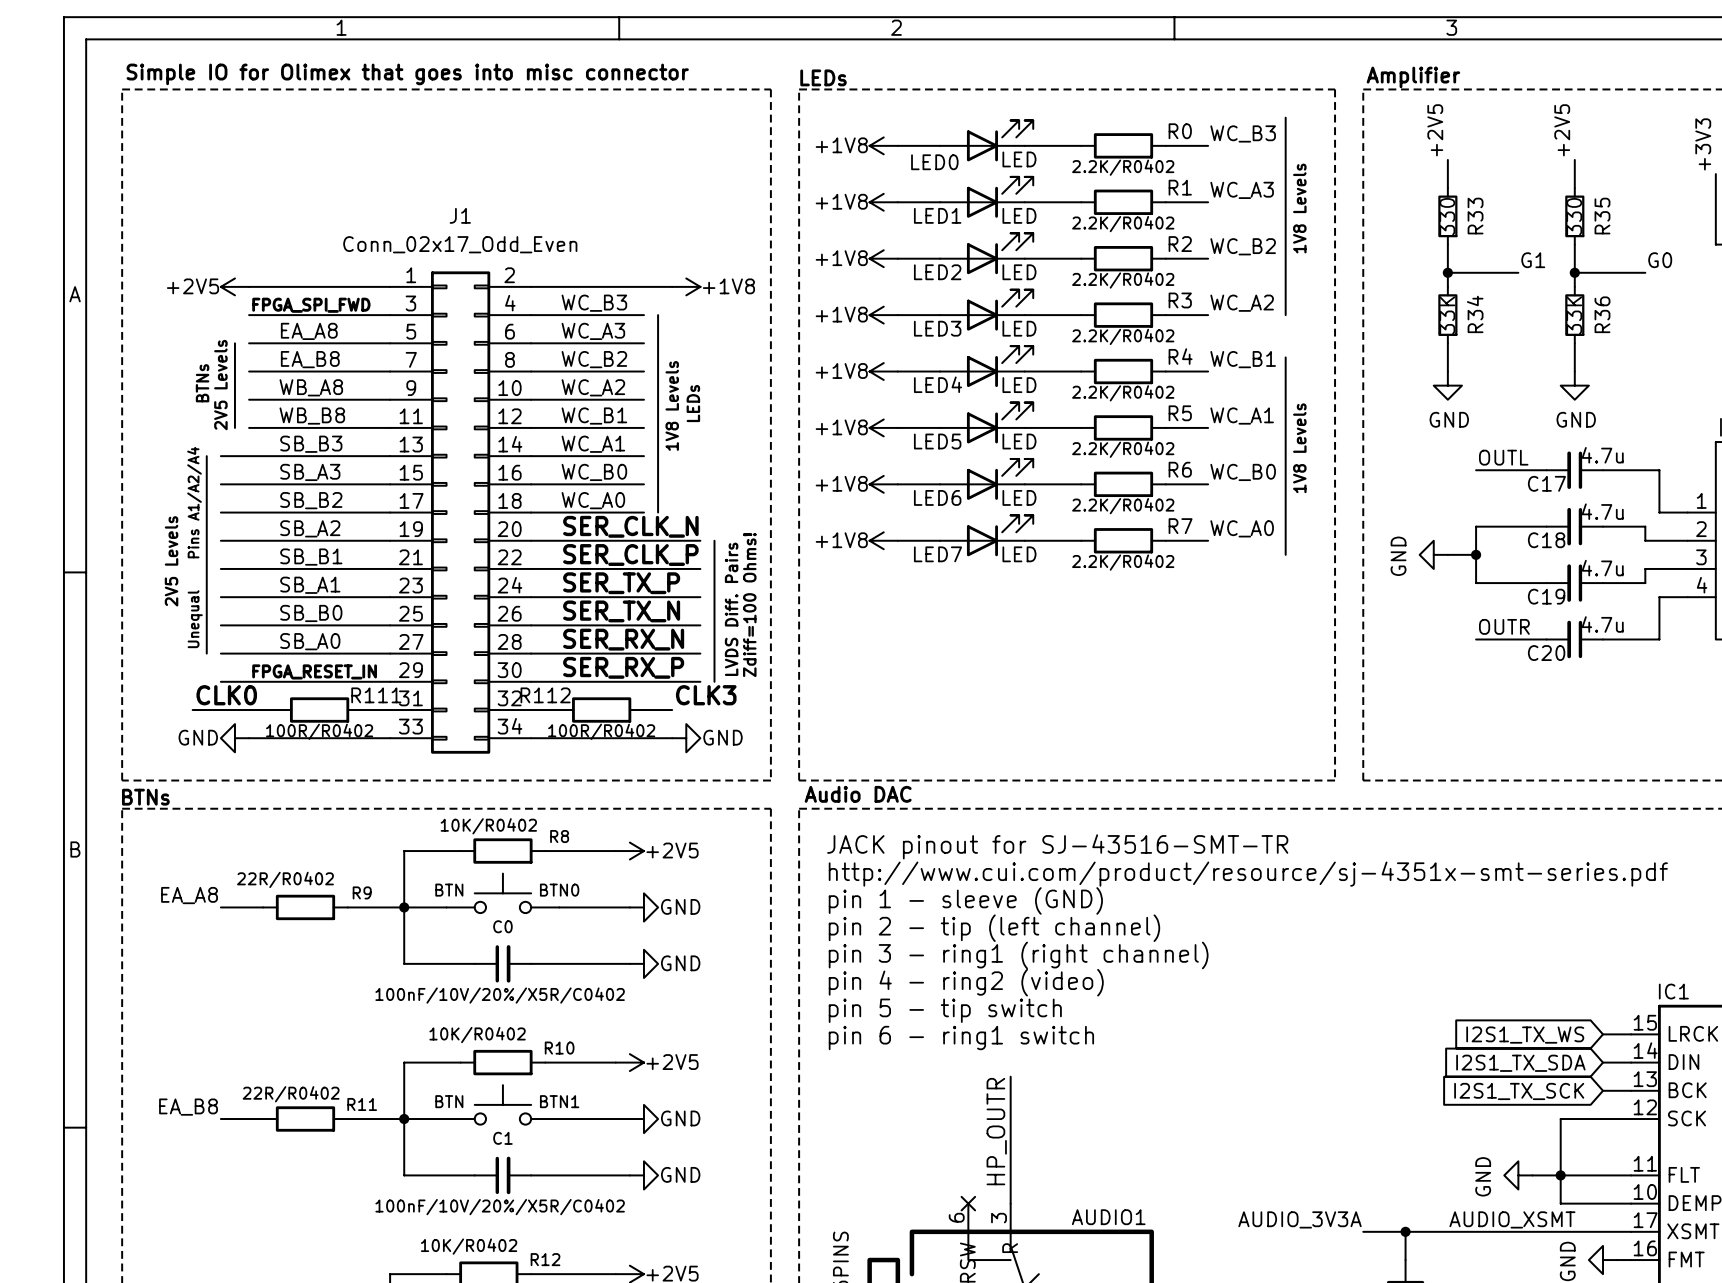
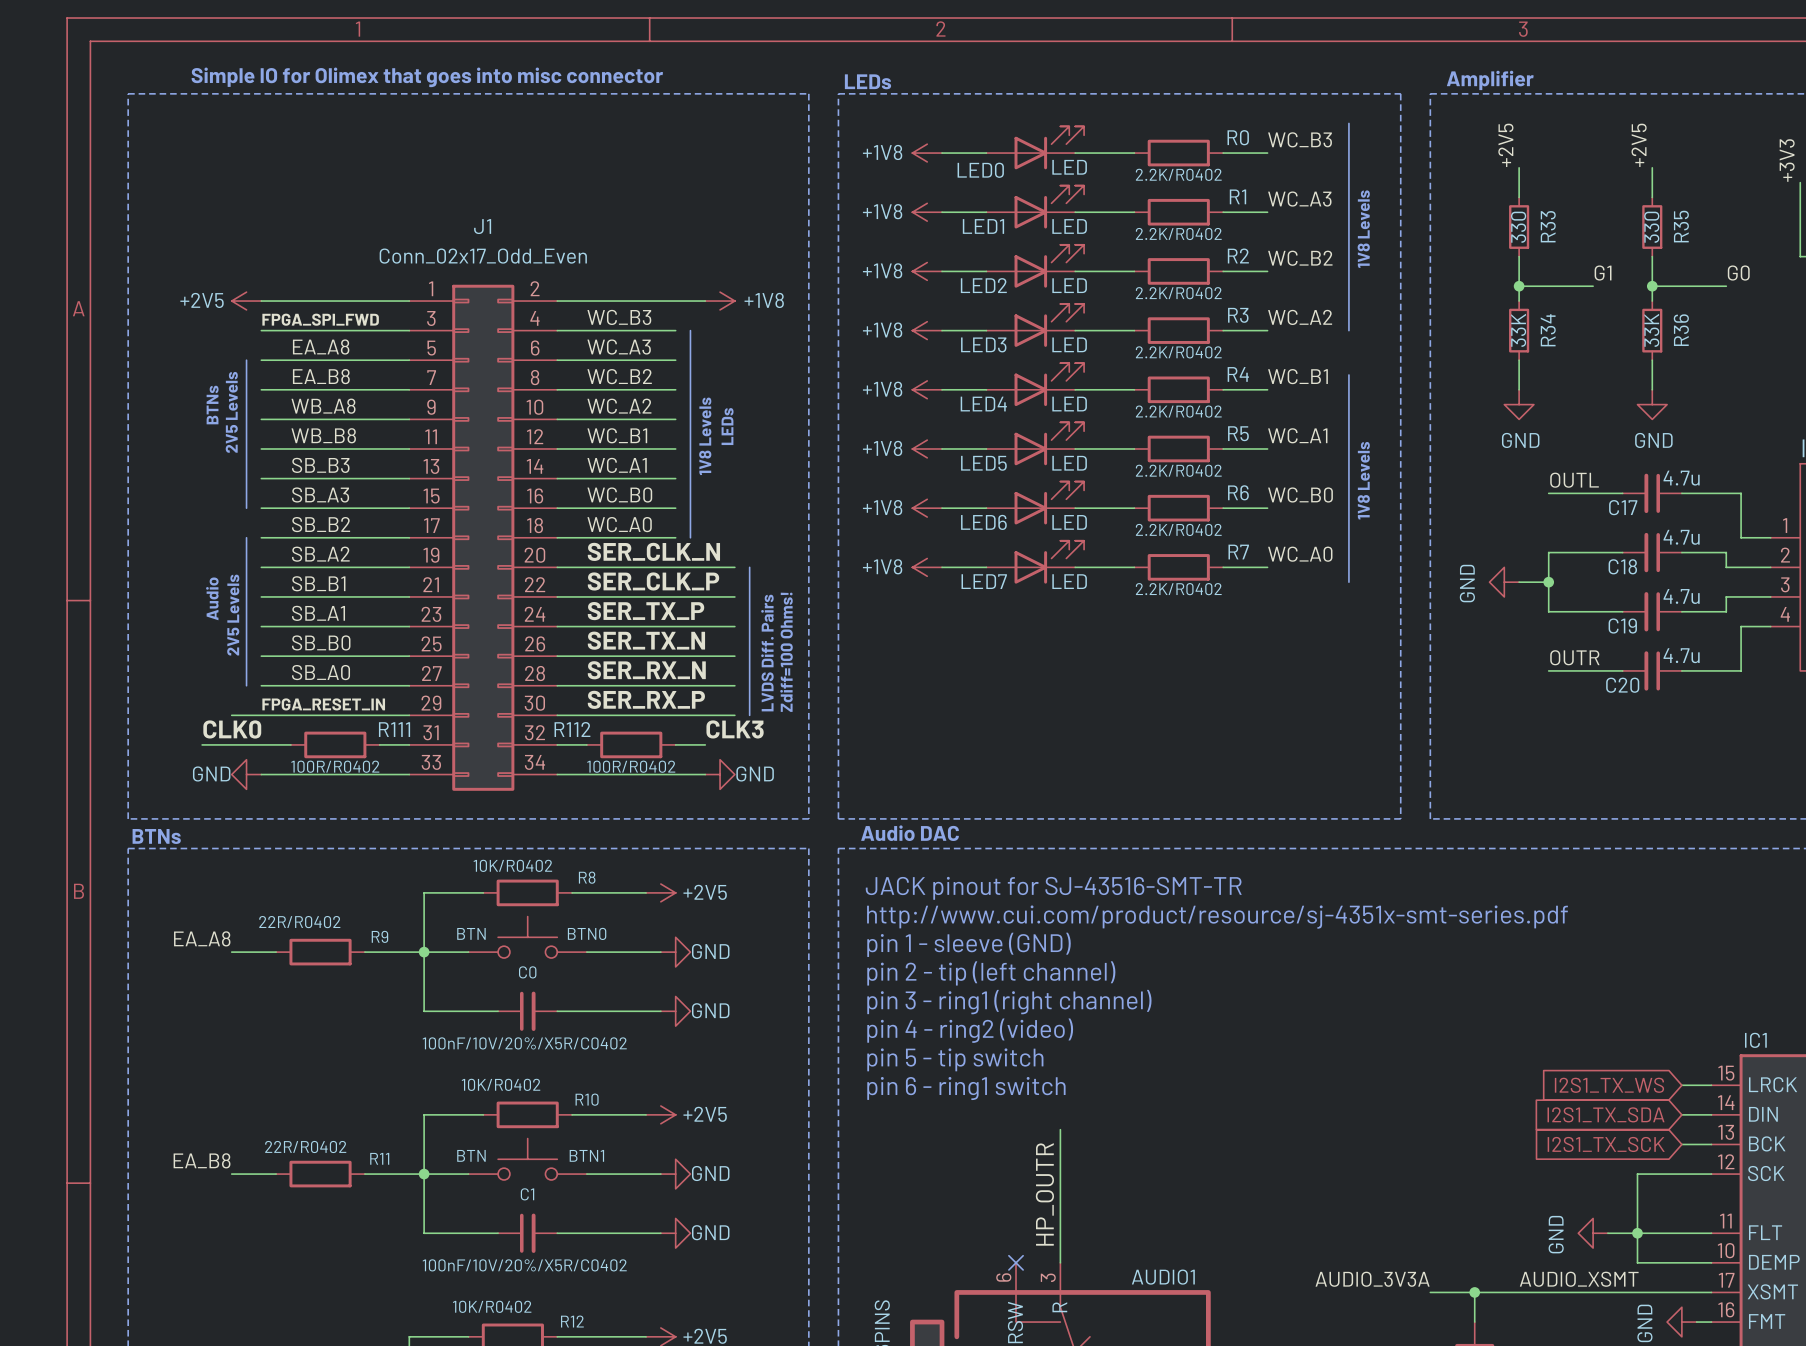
line: none -> (246, 448) (246, 508)
line: (206, 456) (206, 653) -> none
wire: (220, 456) (249, 456) -> none
wire: (220, 484) (249, 484) -> none
wire: (220, 512) (249, 512) -> none
line: none -> (246, 537) (246, 685)
wire: (220, 540) (249, 540) -> none
text: Unequal Pins A1/A2/A4 (194, 547) -> none
text position: 2V5 Levels (171, 561) -> 2V5 Levels (233, 615)
text: none -> Audio (212, 598)
wire: (220, 568) (249, 568) -> none
wire: (220, 597) (249, 597) -> none
wire: (220, 625) (249, 625) -> none
wire: (220, 653) (249, 653) -> none

